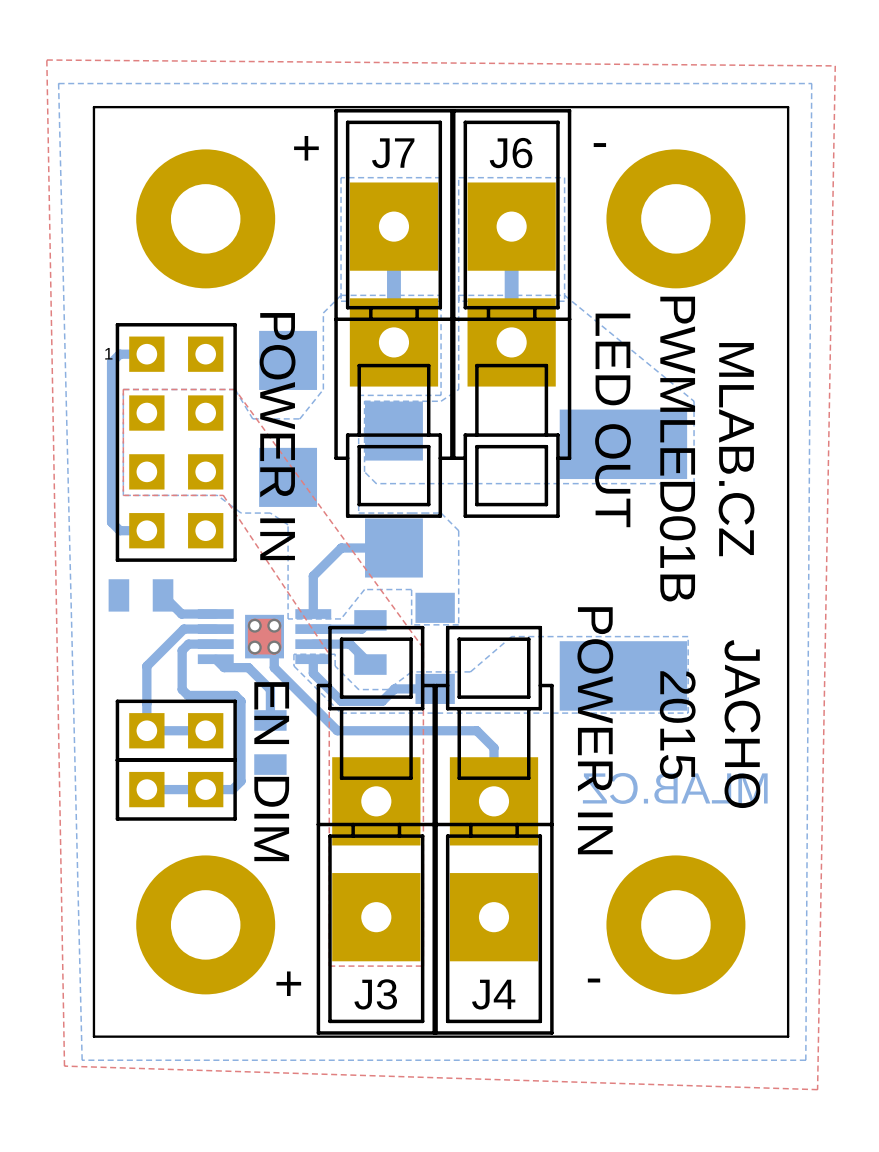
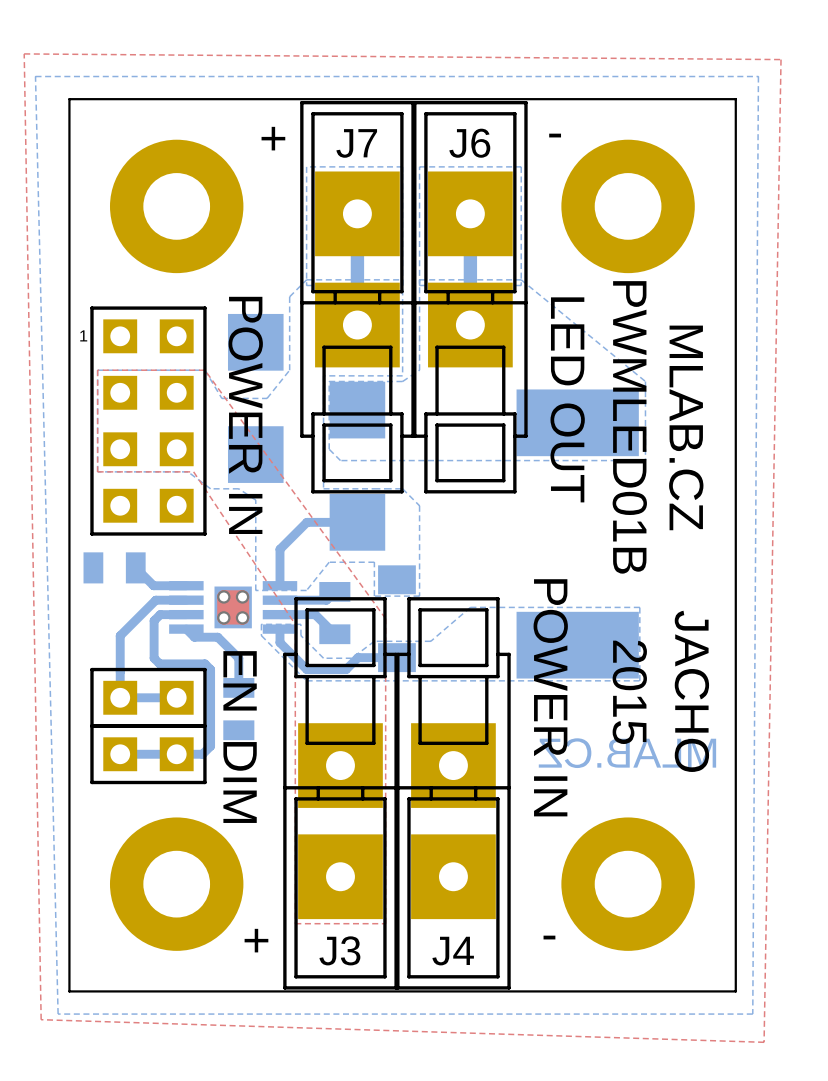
bottom track: (146, 354) (119, 354) (111, 362) (111, 522) (119, 530) (146, 530) -> none
bottom track: (274, 647) (274, 667) (337, 730) (476, 730) (493, 747) (493, 801) -> none

